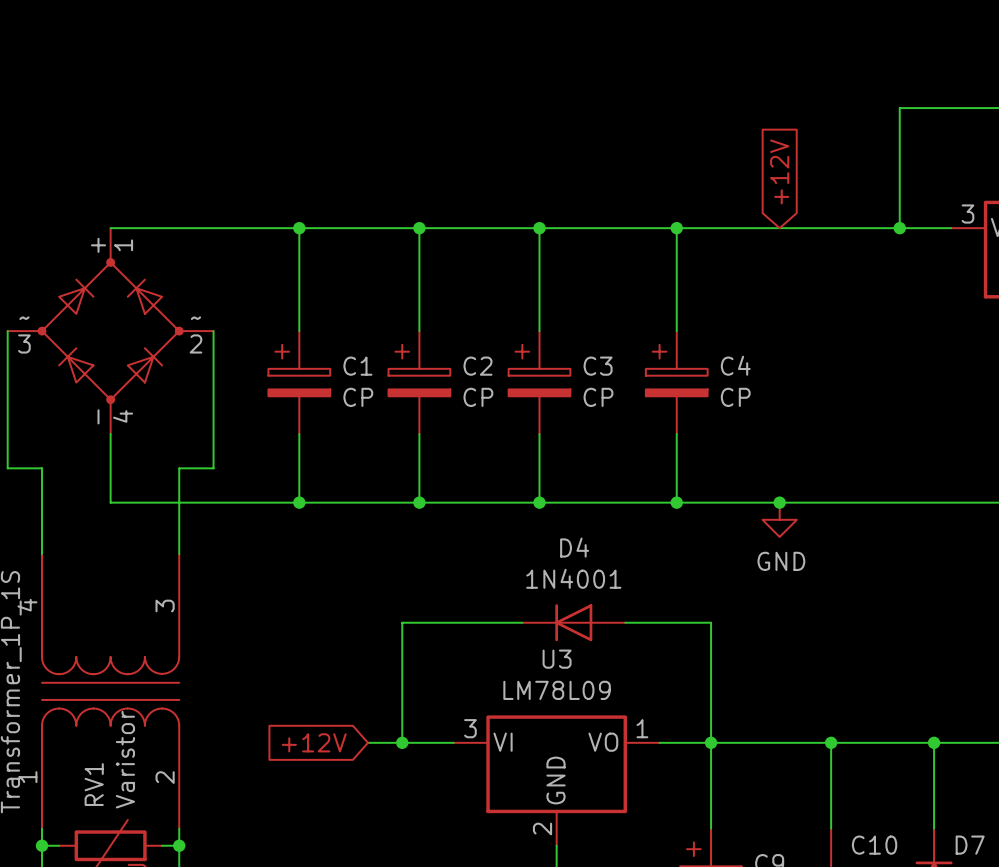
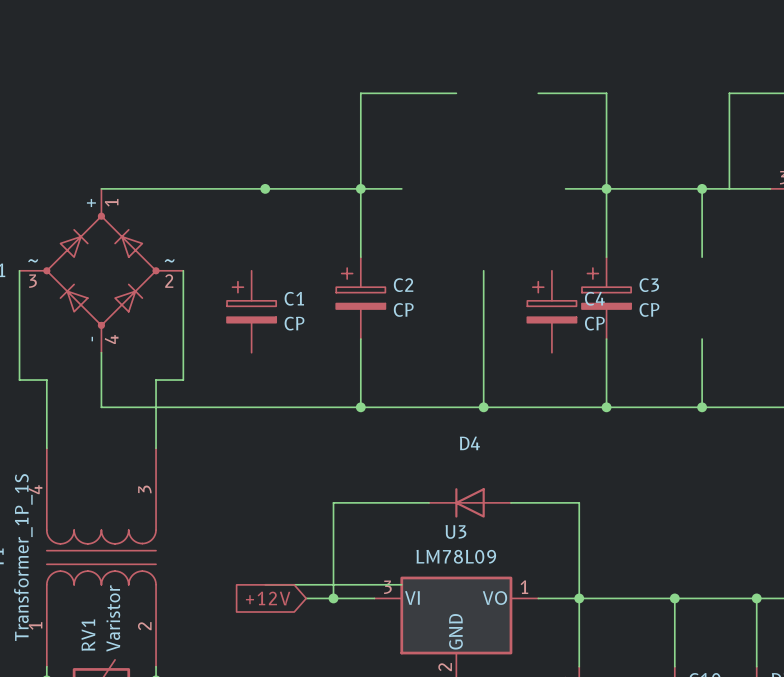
wire: none -> (456, 93) (360, 93) (360, 257)
wire: none -> (538, 93) (606, 93) (606, 257)
global label: +12V (779, 171) -> none
wire: (299, 228) (299, 331) -> none
junction position: (299, 228) -> (265, 188)
wire: (419, 228) (419, 331) -> none
junction position: (419, 228) -> (360, 188)
wire: (488, 228) (693, 228) -> none
wire: (539, 228) (539, 331) -> none
junction: (539, 228) -> none
wire: (676, 228) (676, 331) -> none
junction position: (676, 228) -> (606, 188)
wire: none -> (702, 188) (702, 257)
junction position: (899, 228) -> (702, 188)
wire: none -> (483, 270) (483, 407)
C2 position: (419, 382) -> (360, 298)
C3 position: (539, 382) -> (606, 298)
wire: none -> (360, 339) (360, 407)
wire: none -> (606, 339) (606, 407)
wire: none -> (702, 339) (702, 407)
wire: (299, 434) (299, 502) -> none
wire: (419, 434) (419, 502) -> none
wire: (539, 434) (539, 502) -> none
wire: (676, 434) (676, 502) -> none
junction: (299, 502) -> none
junction position: (419, 502) -> (360, 407)
junction: (539, 502) -> none
junction: none -> (483, 407)
junction: (676, 502) -> none
junction: none -> (606, 407)
junction: (779, 502) -> none
junction: none -> (702, 407)
power symbol: GND (779, 519) -> none
D4 value: 1N4001 (573, 578) -> none
wire: none -> (265, 584) (401, 584)

